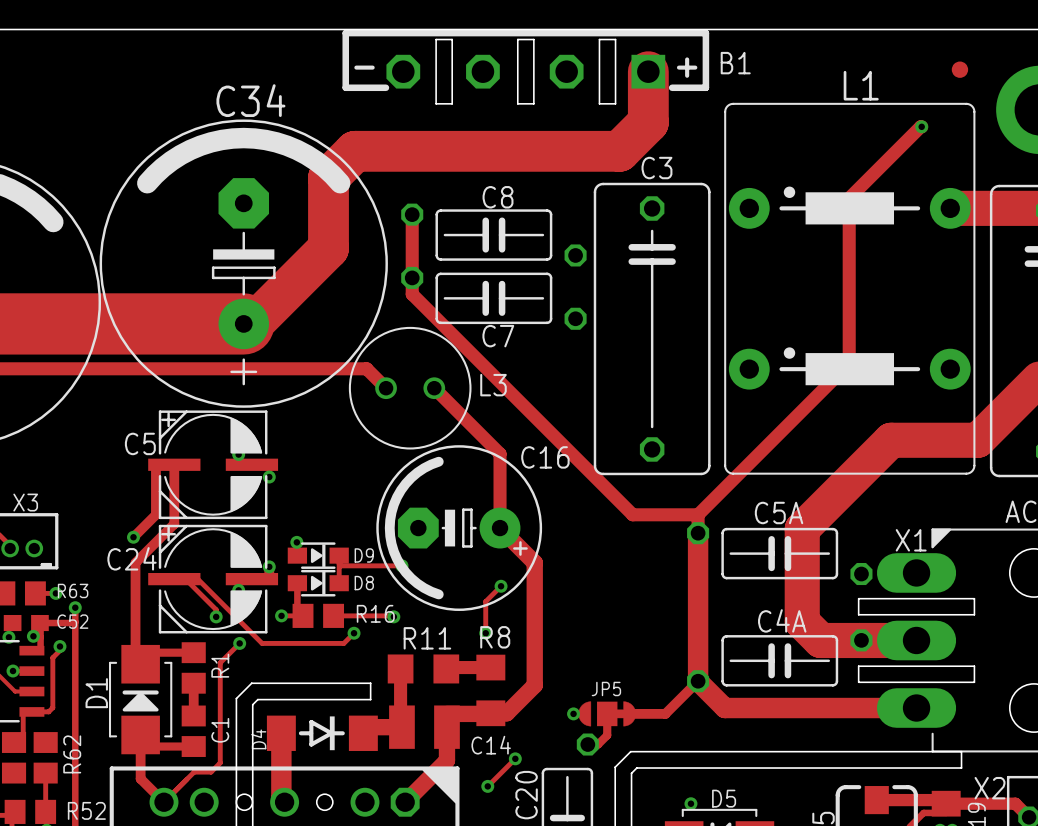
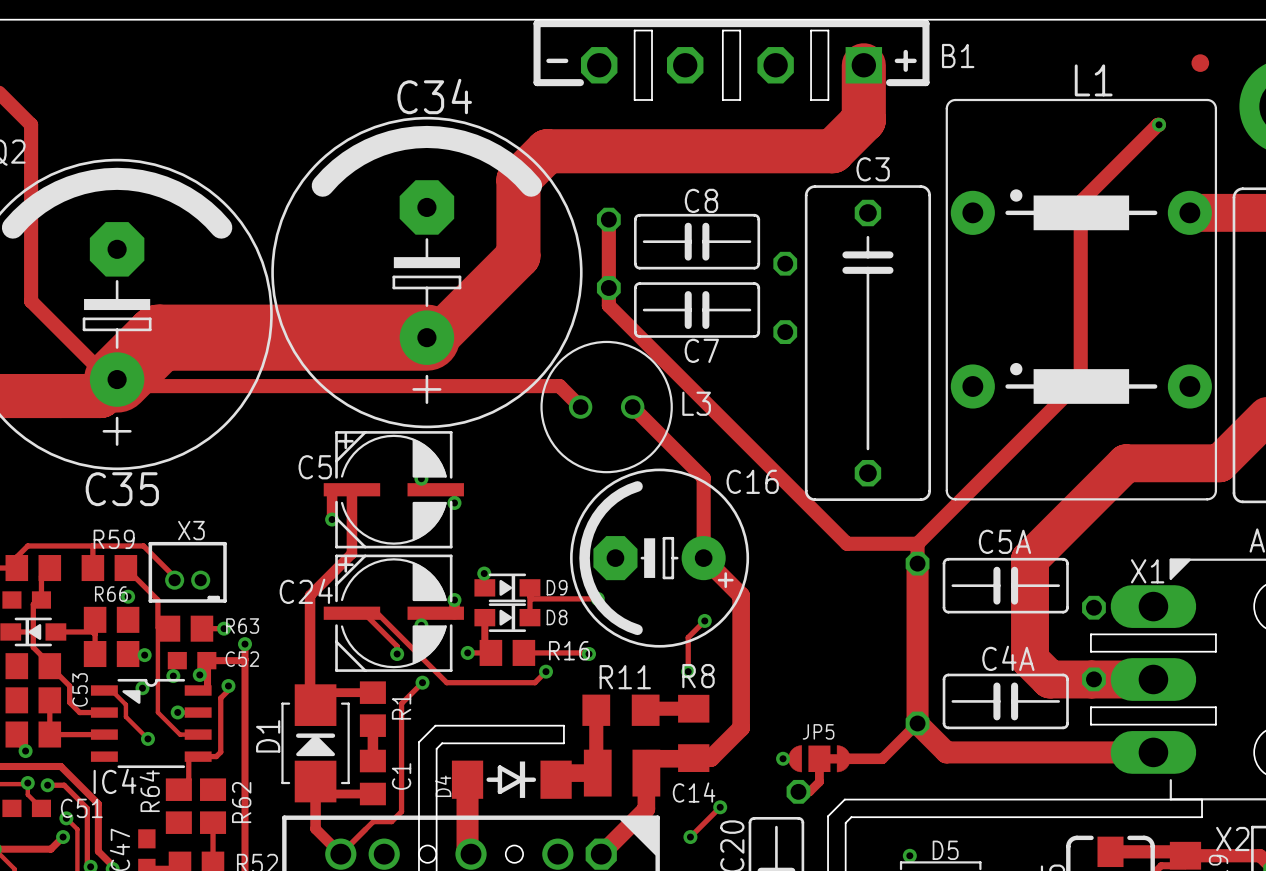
track: (155, 492) (155, 514) (133, 537) -> none
via position: (133, 537) -> (332, 519)

